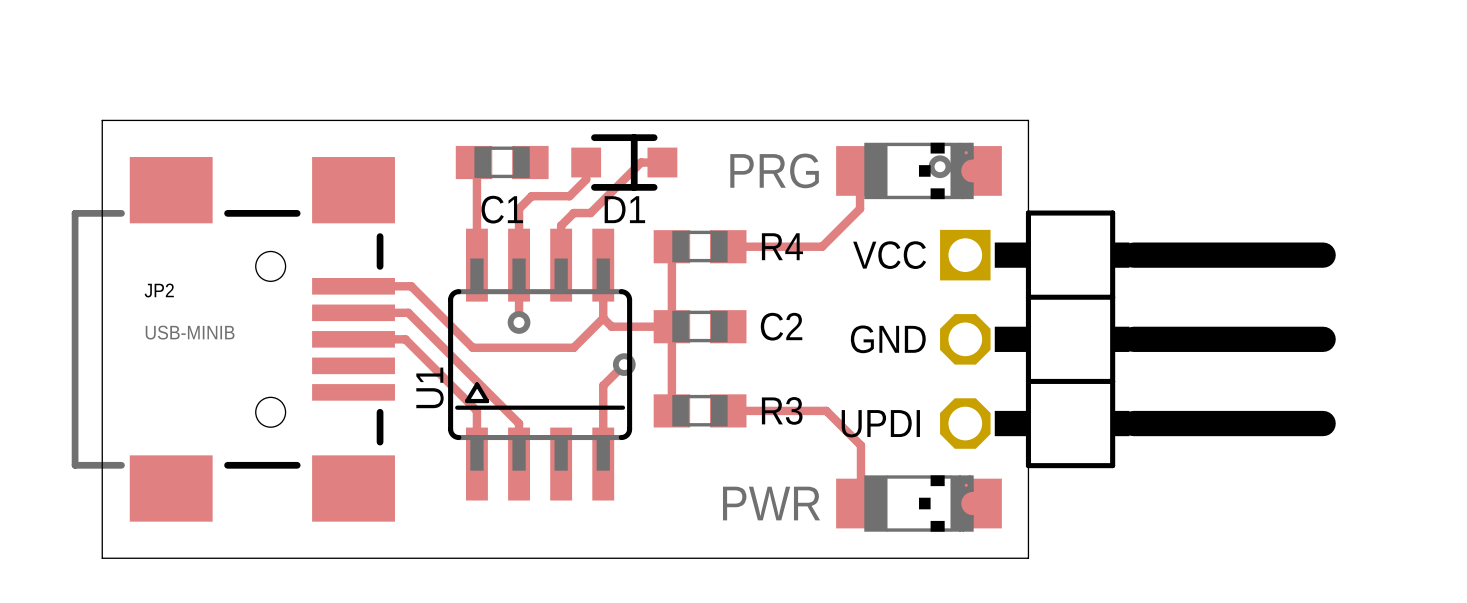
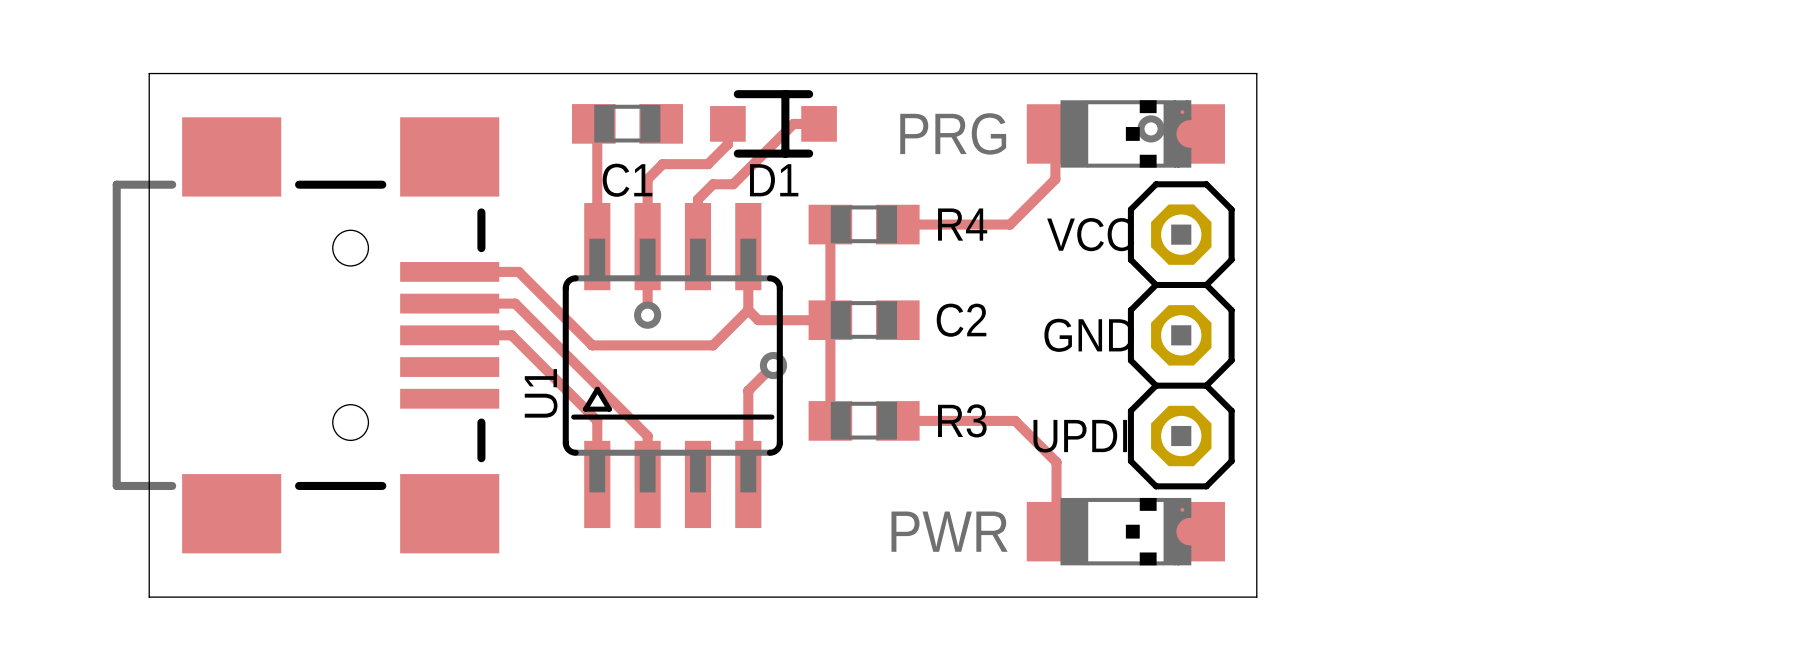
JP2 name: JP2 (159, 290) -> none
JP2 value: USB-MINIB (190, 332) -> none
part: none -> (1181, 335)
part: (1137, 339) -> none

